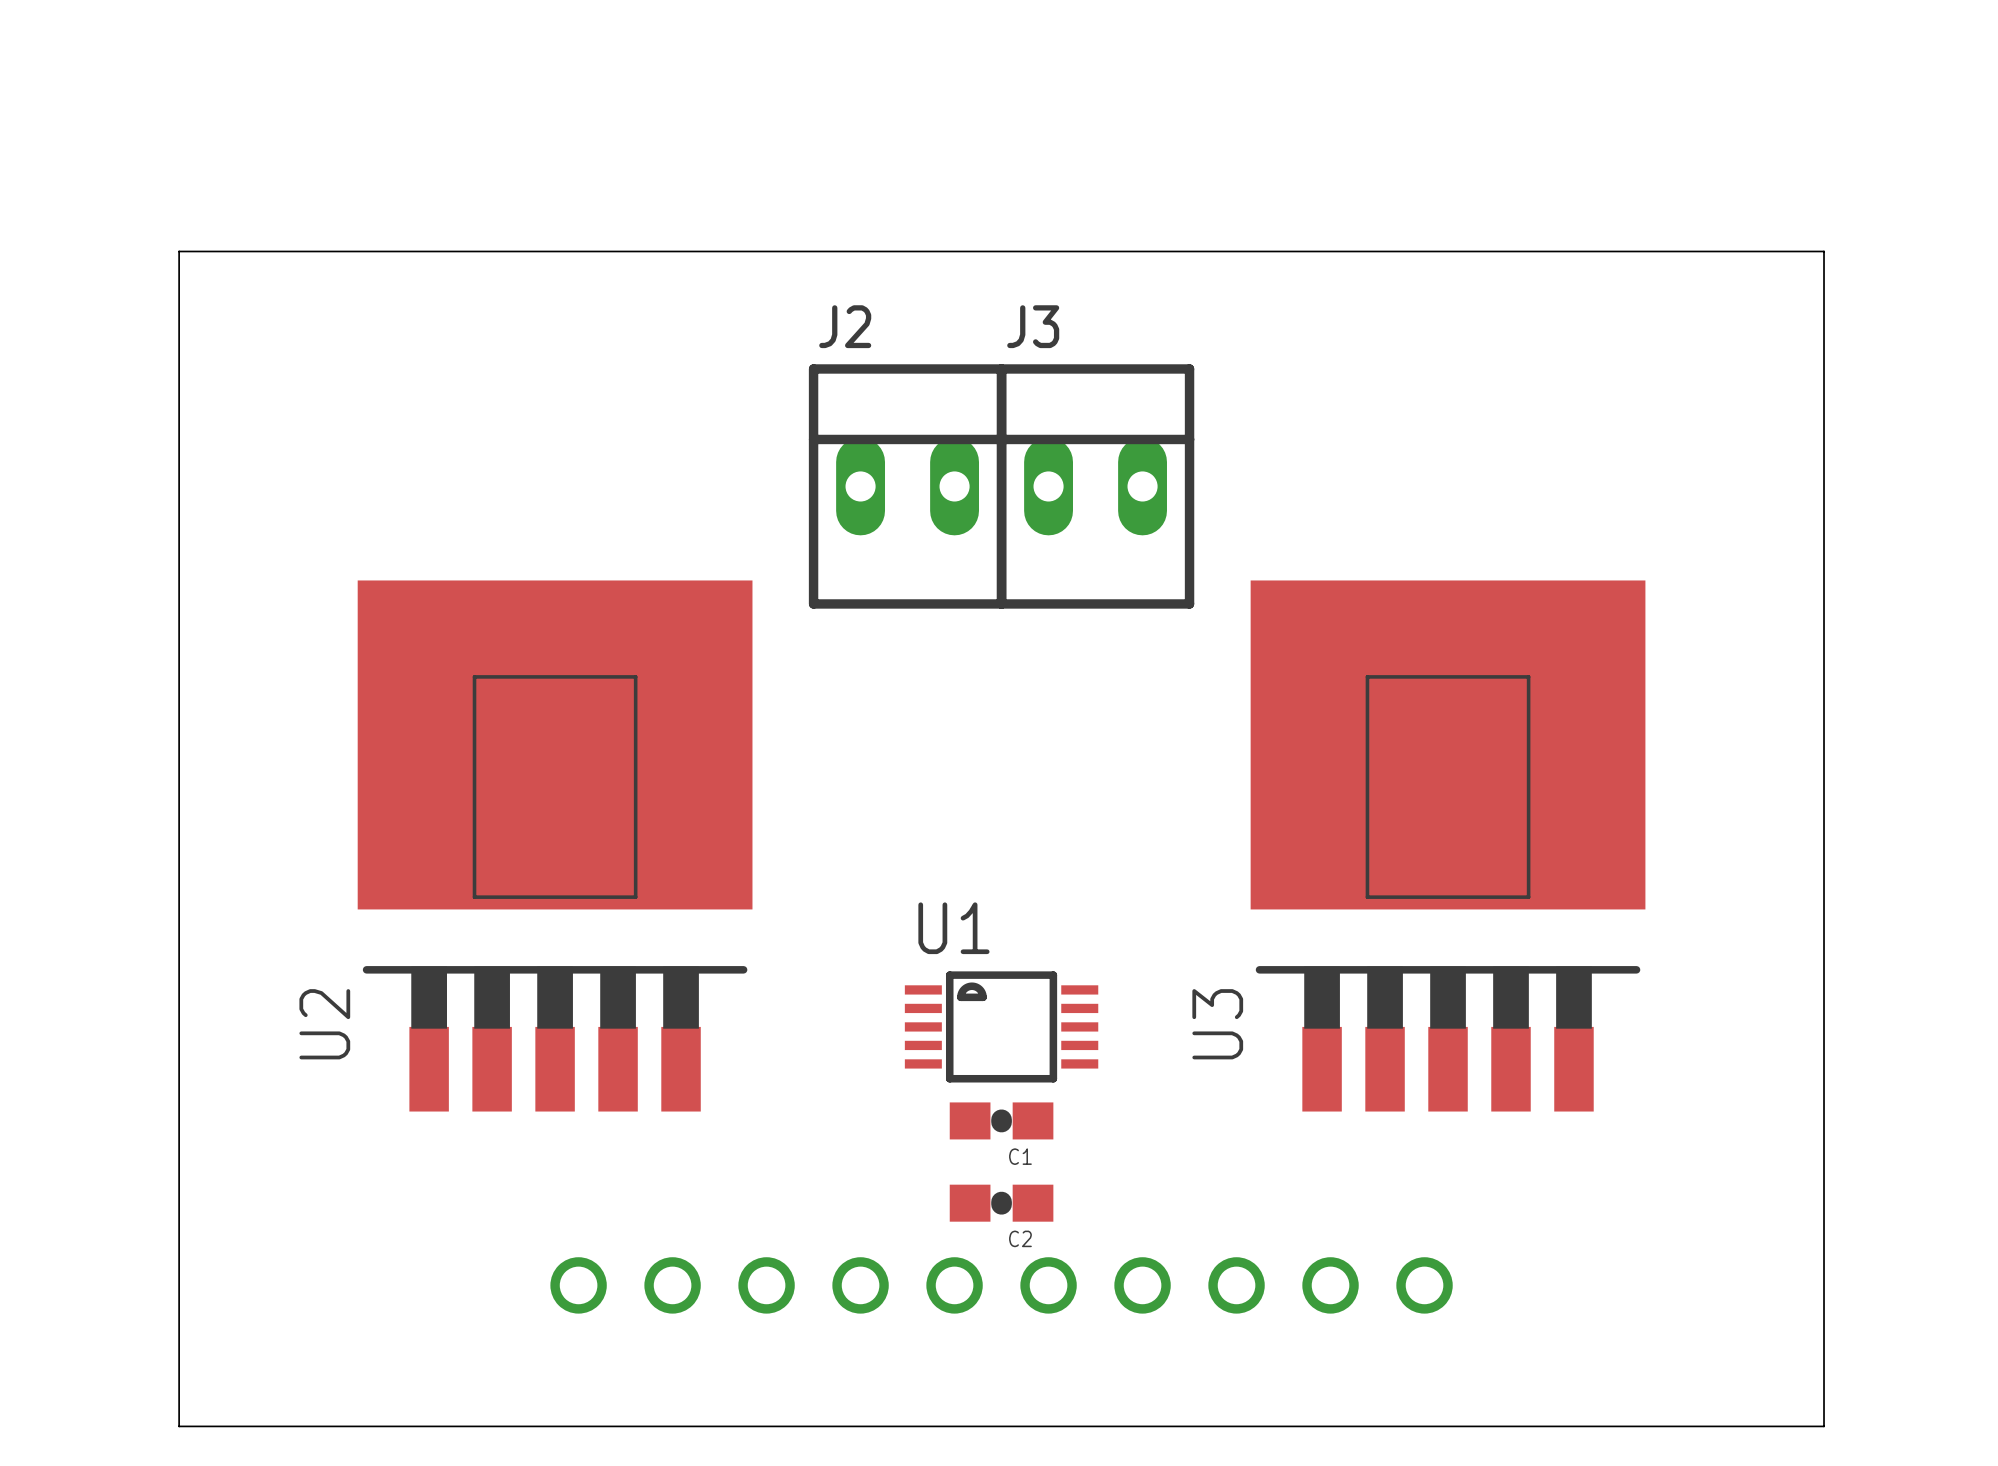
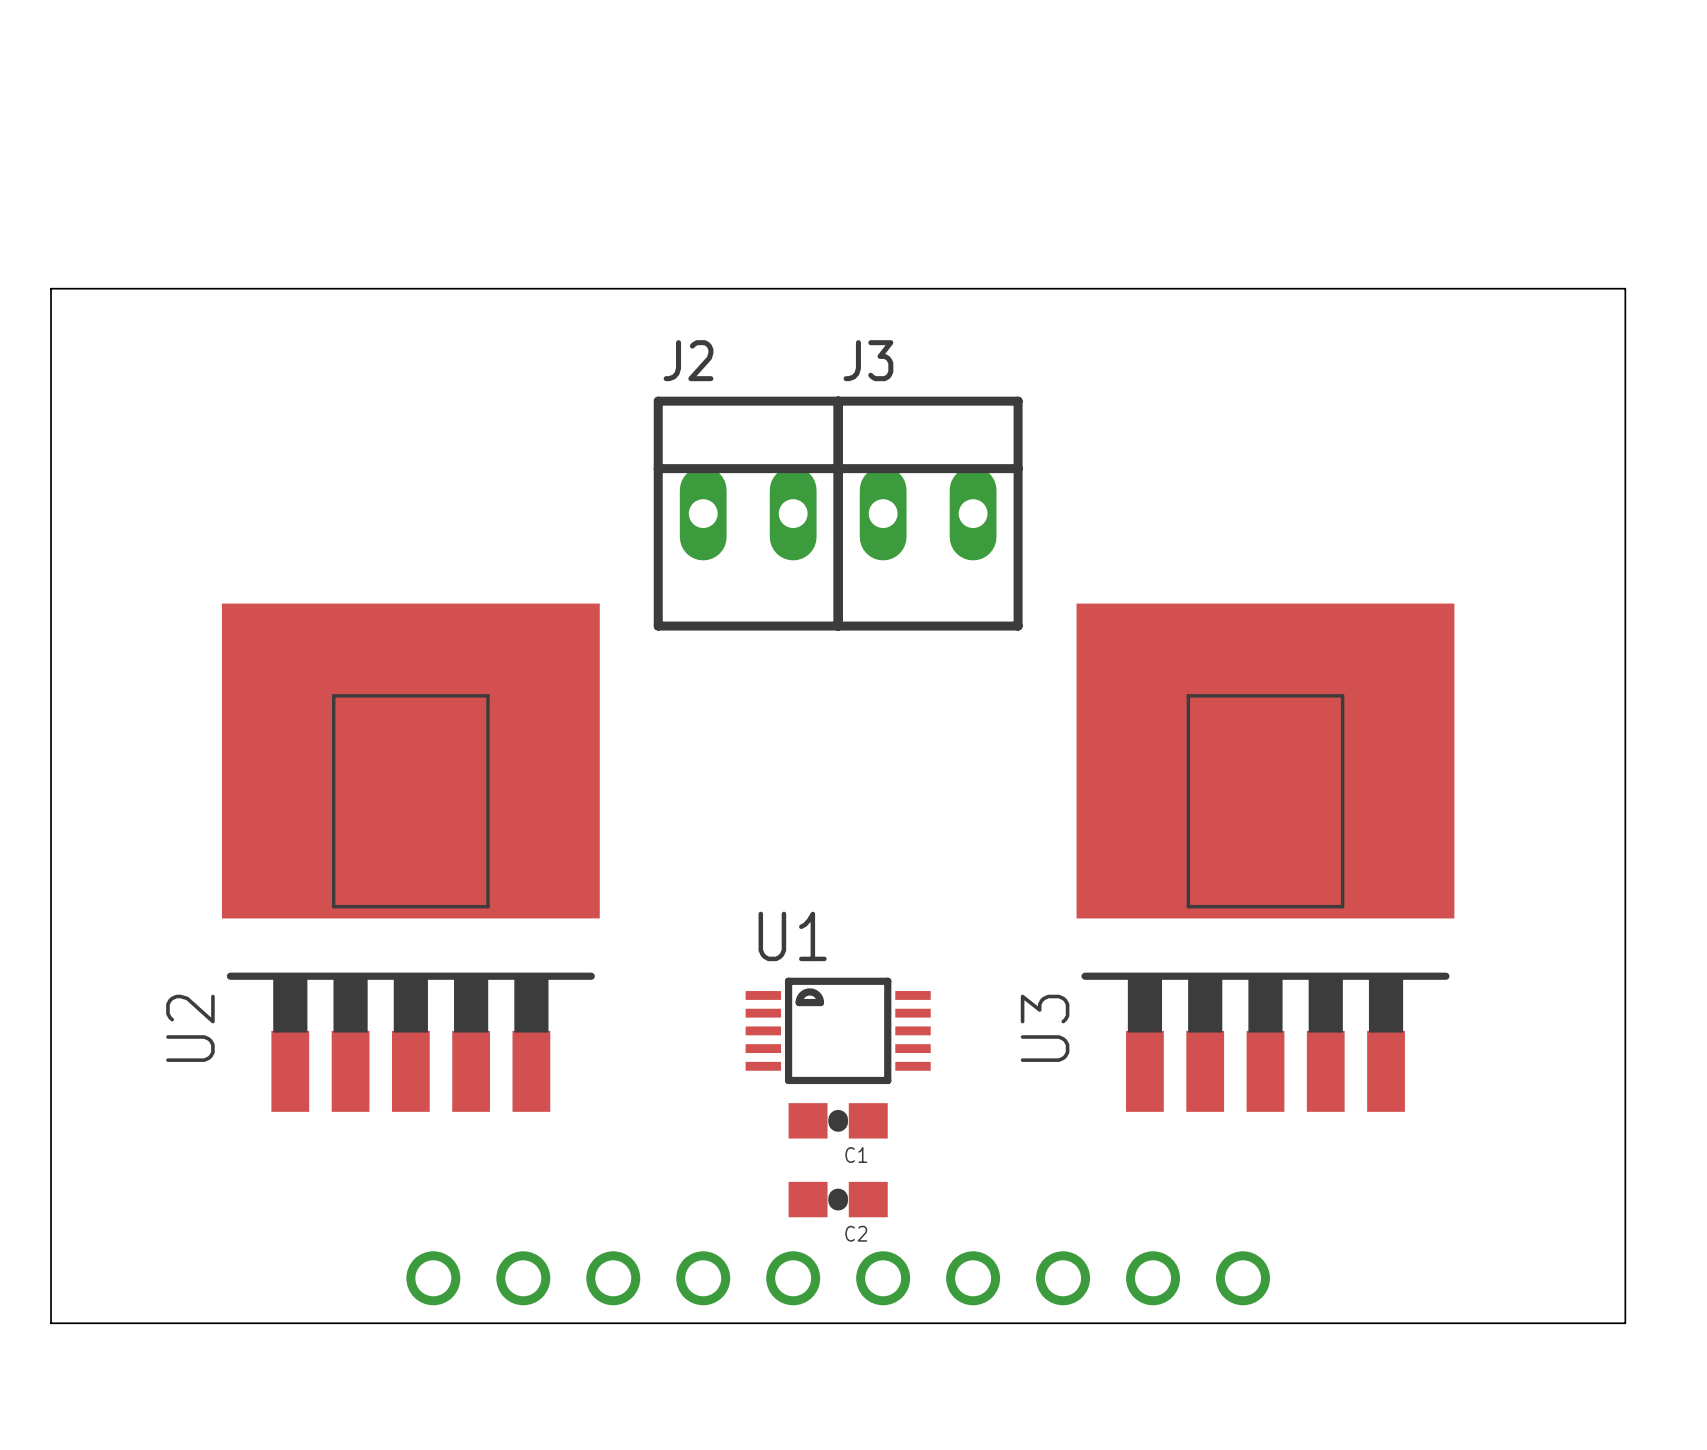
board edge: (179, 1332) (179, 1426) (1824, 1426) (1824, 1332) -> (51, 1323) (1625, 1323)

